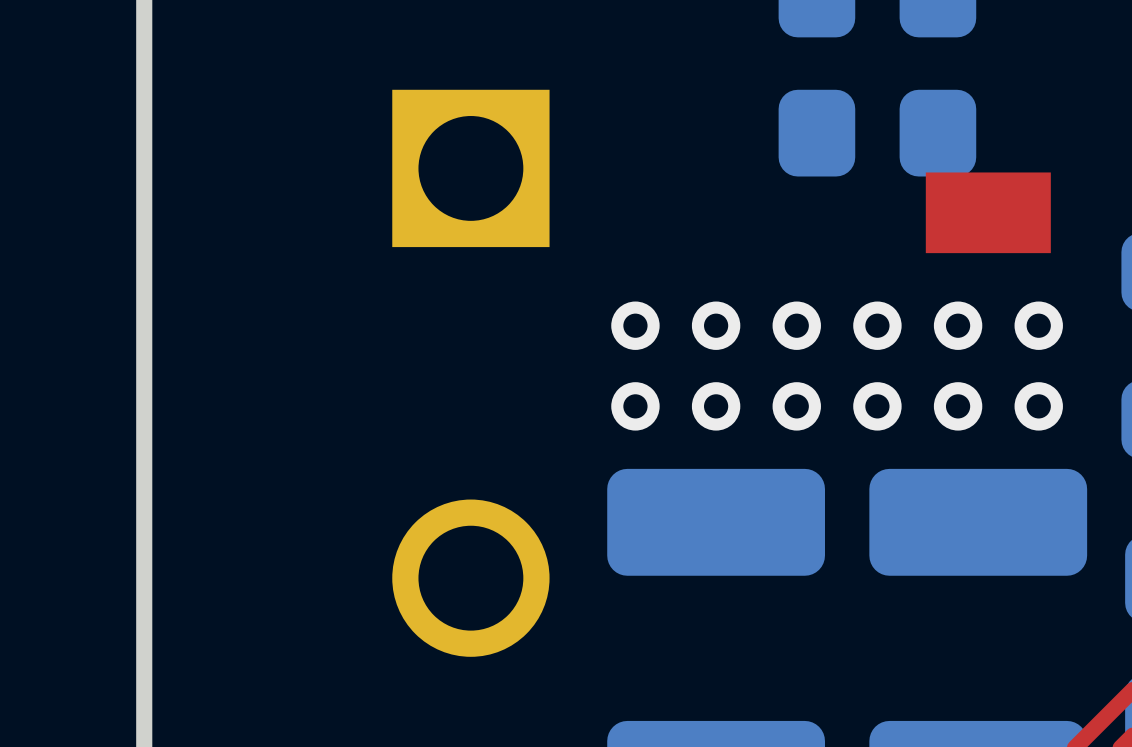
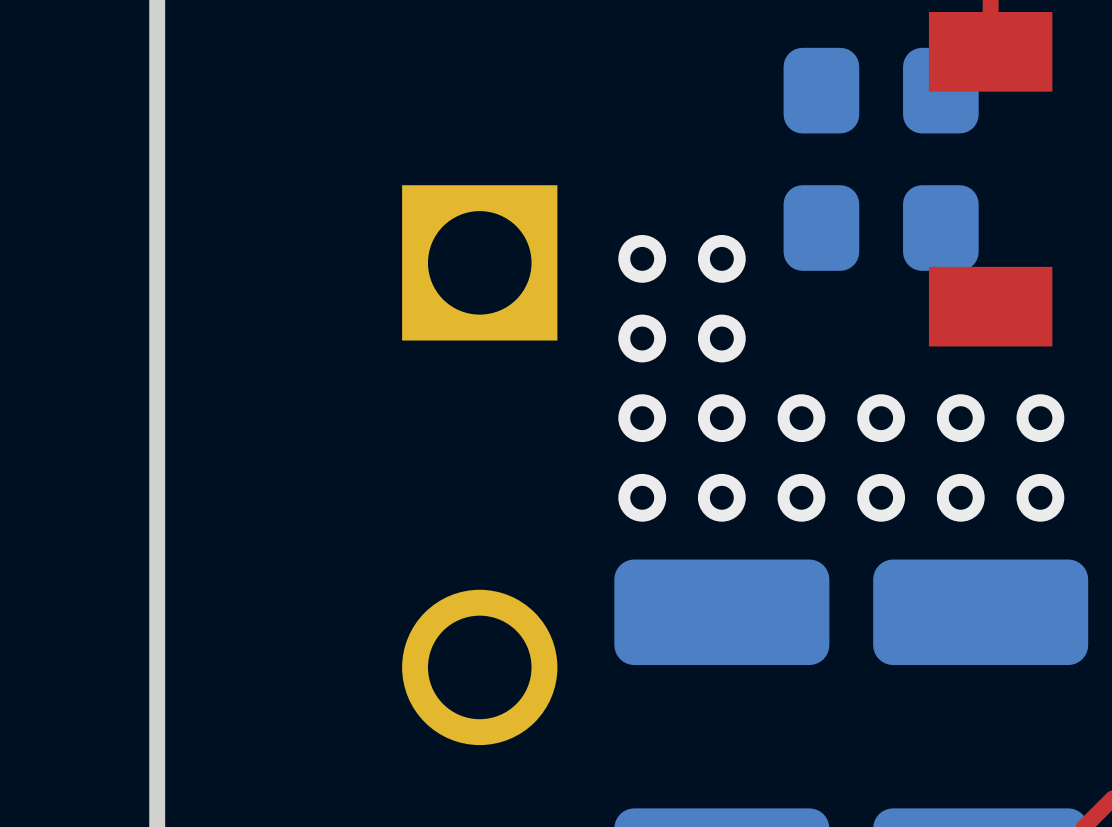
via: none -> (642, 258)
via: none -> (721, 258)
via: none -> (642, 338)
via: none -> (721, 338)

